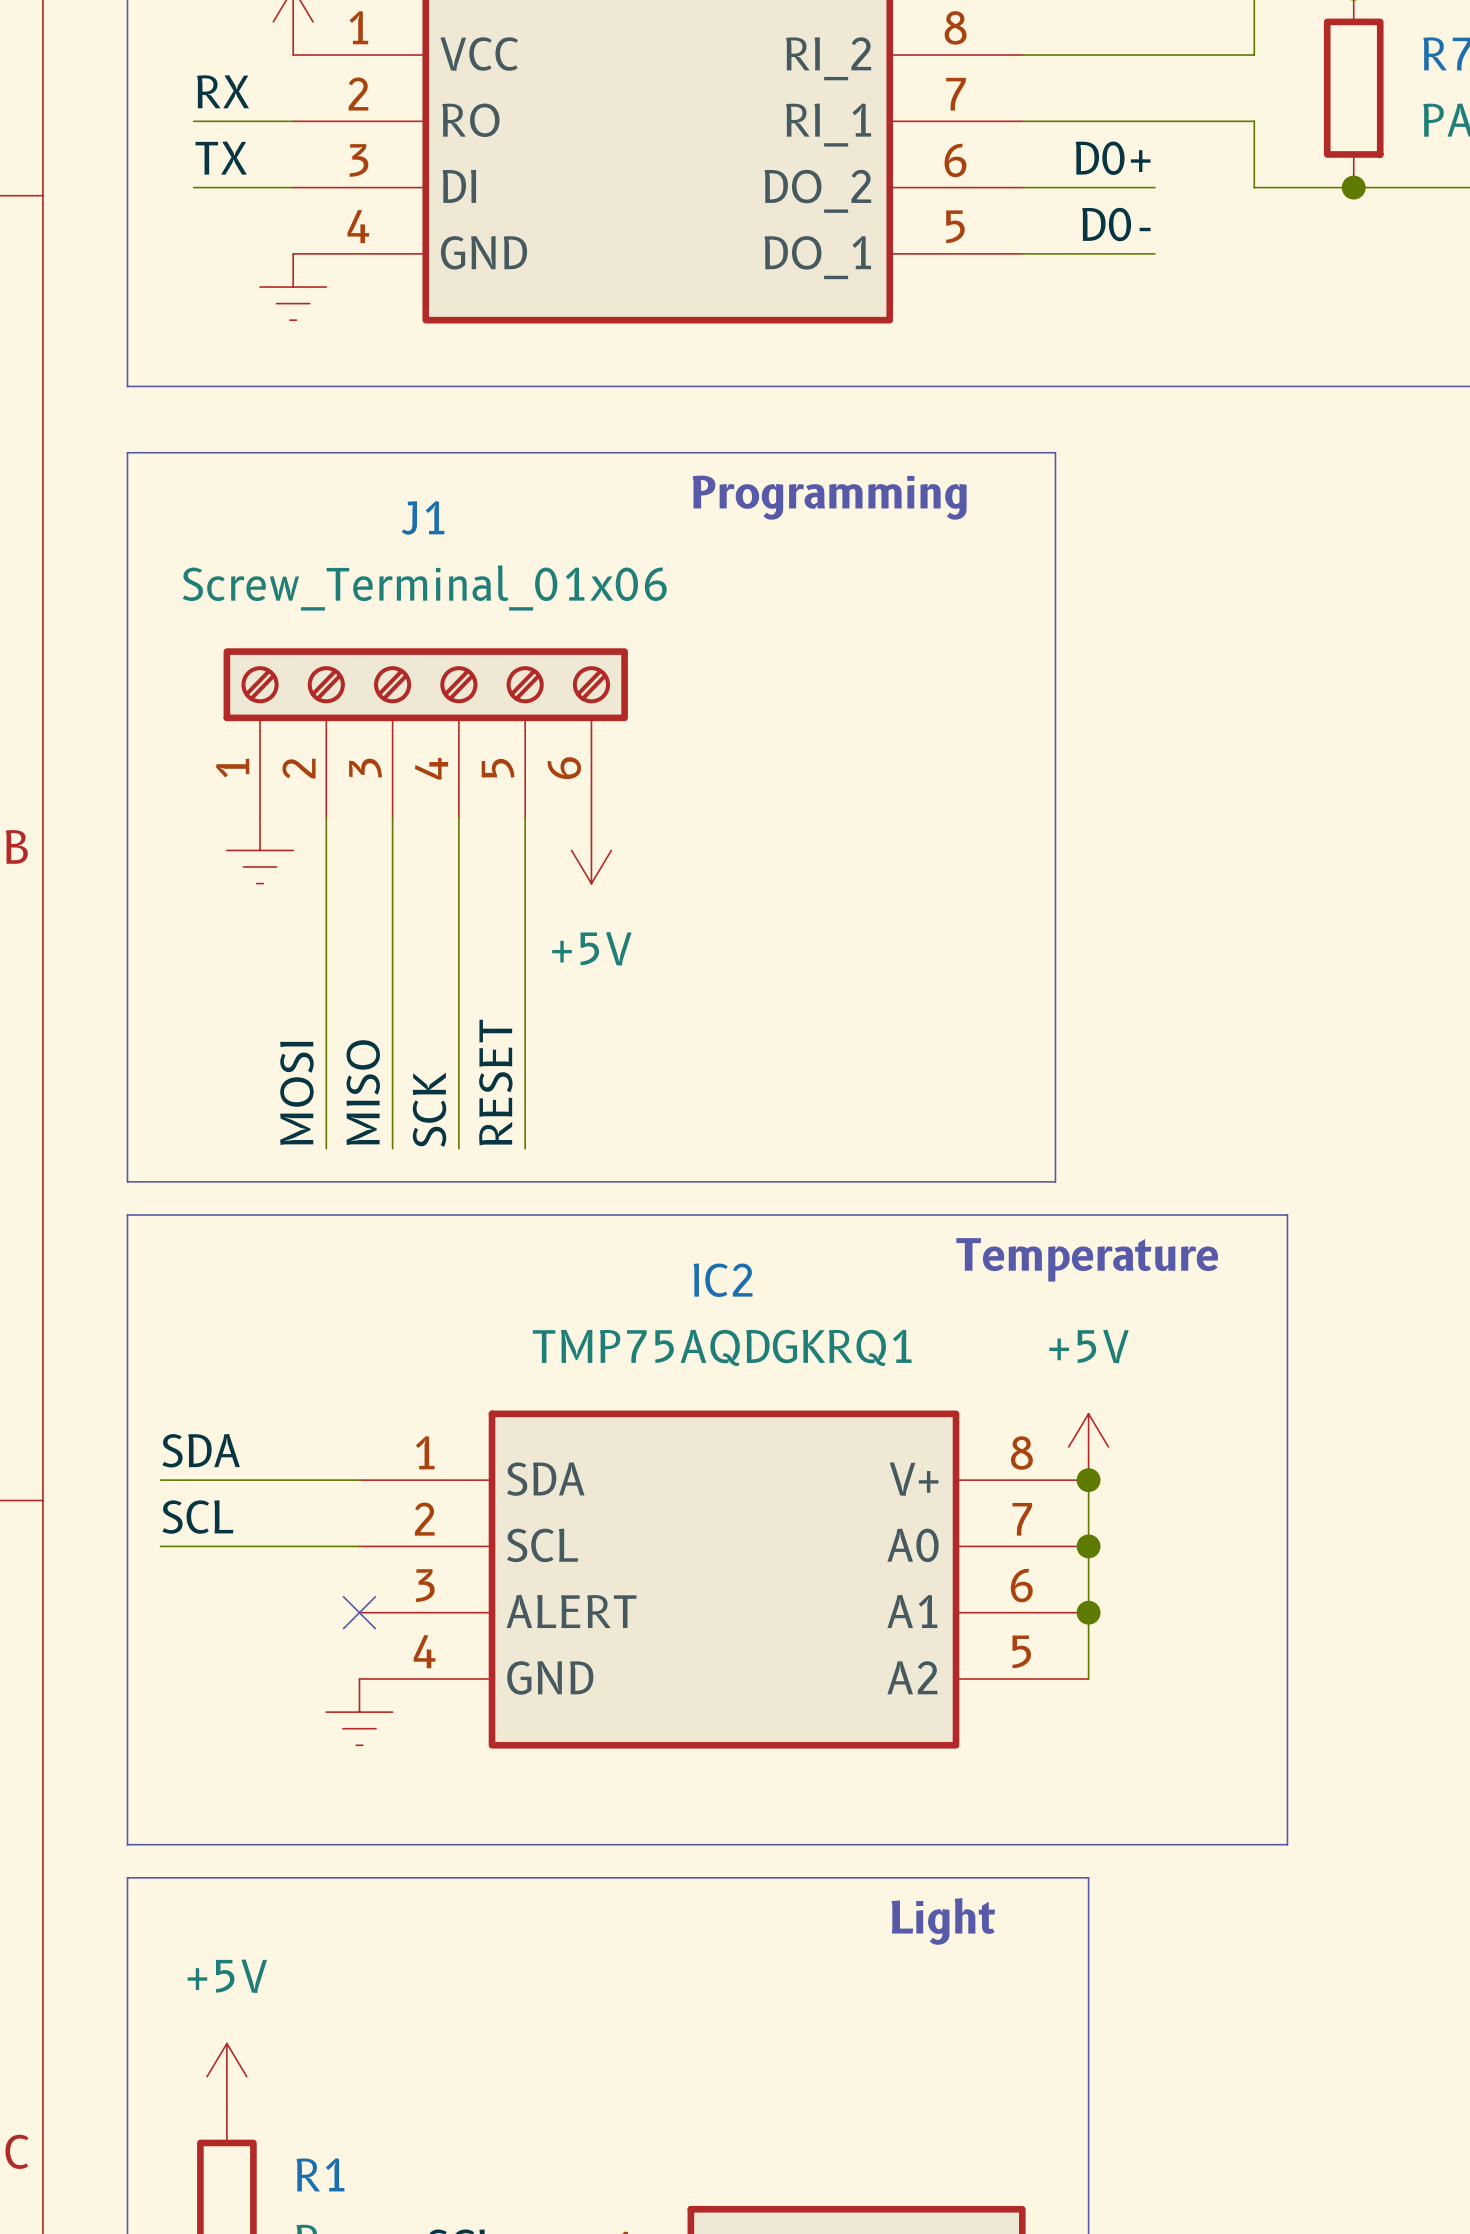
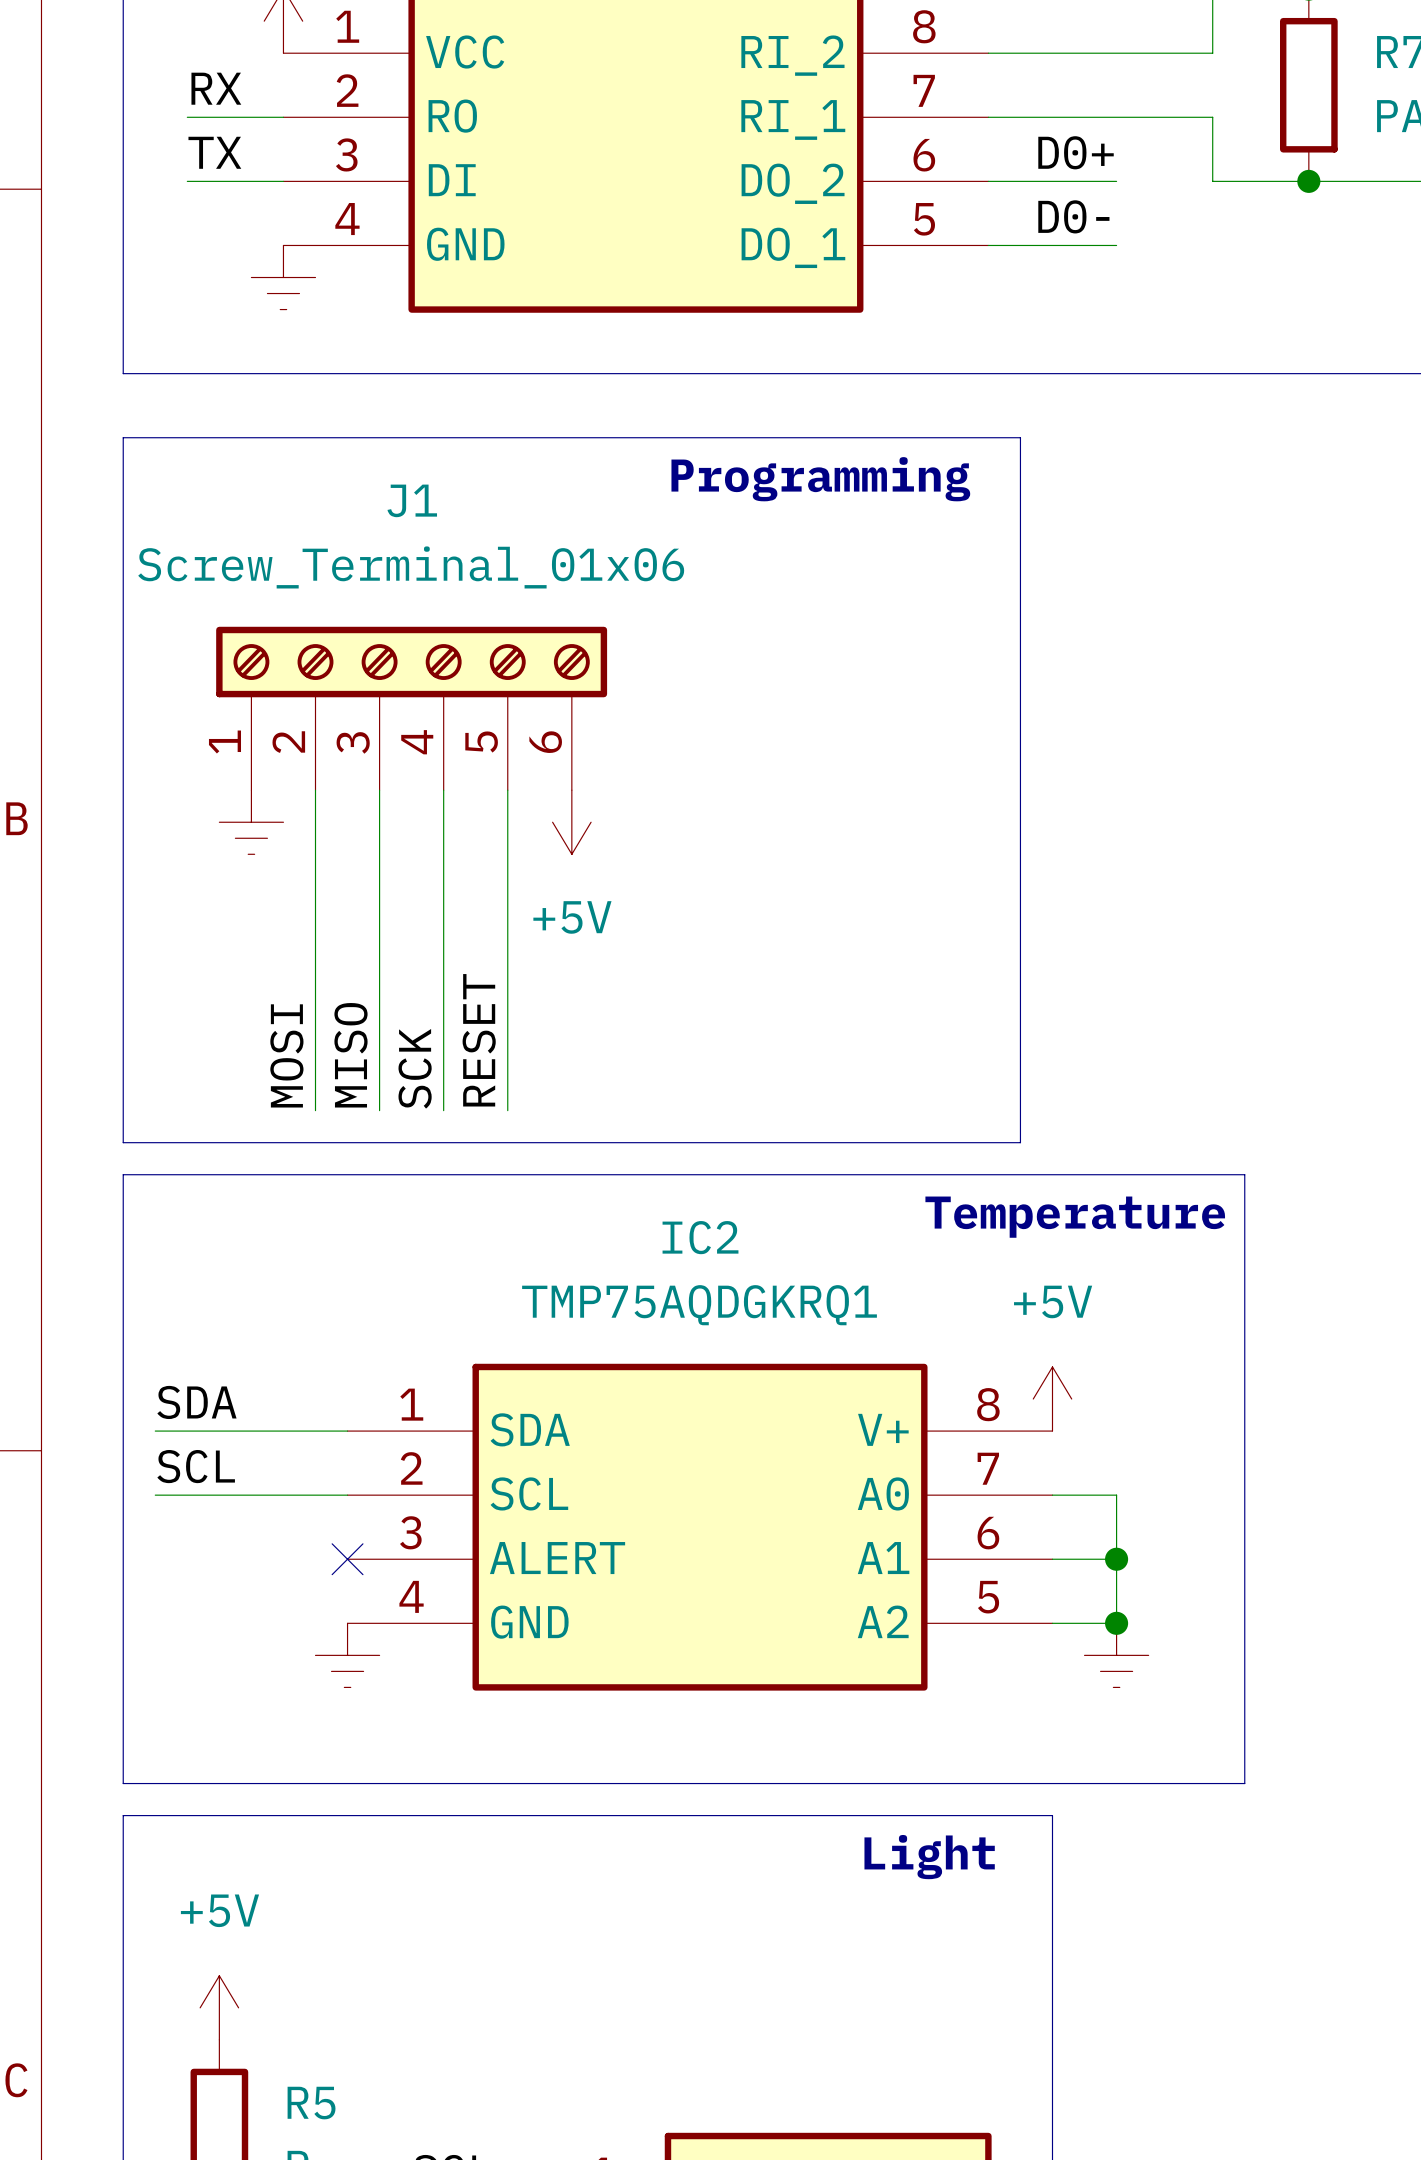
wire: (1088, 1480) (1088, 1678) -> (1052, 1495) (1116, 1495) (1116, 1623) (1052, 1623)
junction: (1088, 1480) -> none
junction: (1088, 1546) -> none
wire: none -> (1052, 1559) (1116, 1559)
junction: (1088, 1612) -> none
junction: none -> (1116, 1559)
junction: none -> (1116, 1623)
power symbol: none -> (1116, 1655)
R1 name: R1 (320, 2174) -> R5 (311, 2103)

